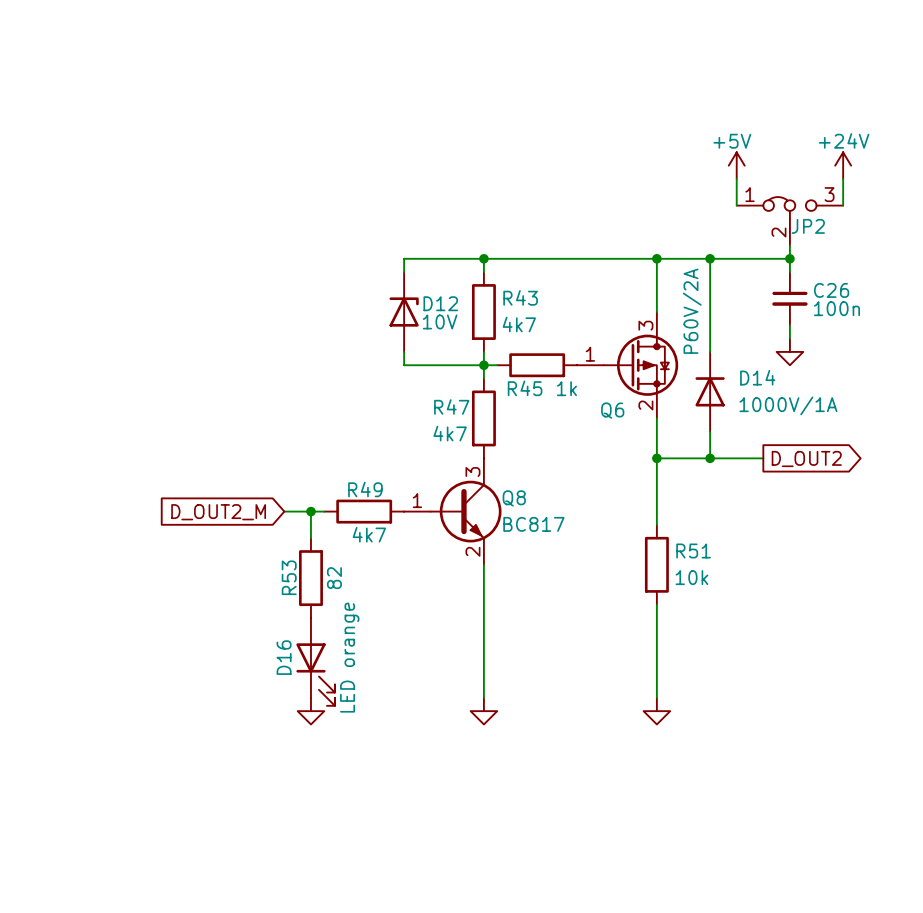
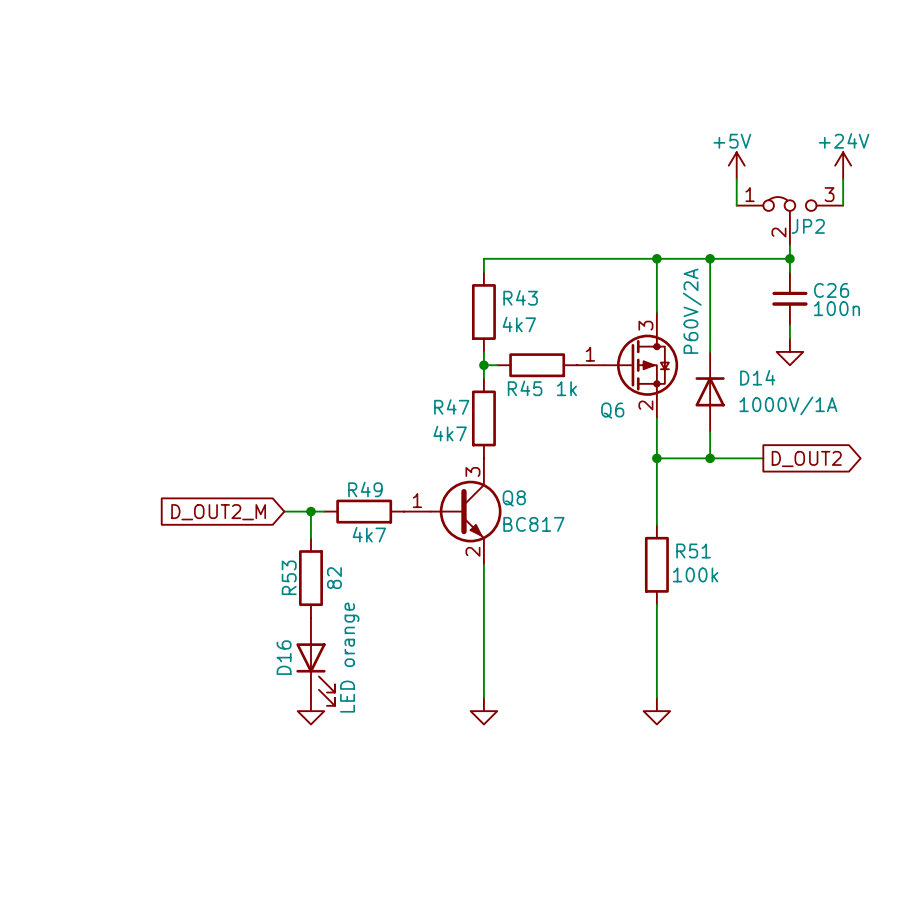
wire: (483, 258) (404, 258) (404, 272) -> none
junction: (483, 258) -> none
D12: 10V (404, 312) -> none
wire: (404, 351) (404, 365) (483, 365) -> none
R51 value: 10k (691, 577) -> 100k (695, 574)

